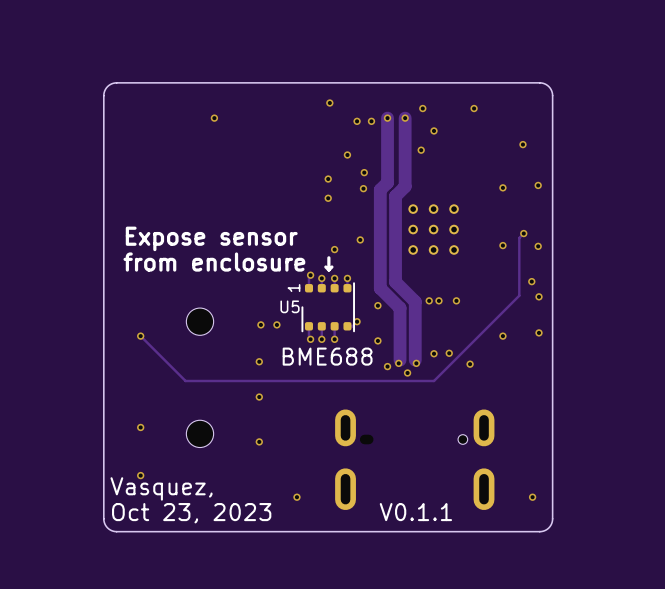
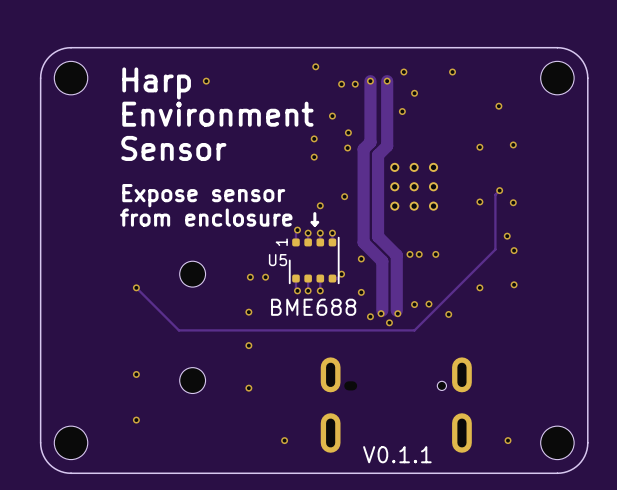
board edge: (116, 82) (107, 86) (103, 95) (103, 518) (107, 527) (116, 531) -> (113, 47) (71, 47) (57, 50) (45, 61) (40, 78) (41, 449) (47, 461) (60, 471) (113, 473)
board edge: (539, 82) (548, 86) (552, 95) (552, 518) (548, 527) (539, 531) -> (514, 47) (557, 47) (570, 50) (583, 61) (587, 78) (587, 449) (578, 464) (567, 471) (514, 473)
part: none -> (71, 78)
part: none -> (557, 78)
text: none -> Harp (156, 83)
text: none -> Environment (217, 114)
text: none -> Sensor (173, 148)
text: Vasquez, (161, 488) -> none
part: none -> (71, 442)
part: none -> (557, 442)
text: Oct 23, 2023 (191, 513) -> none

